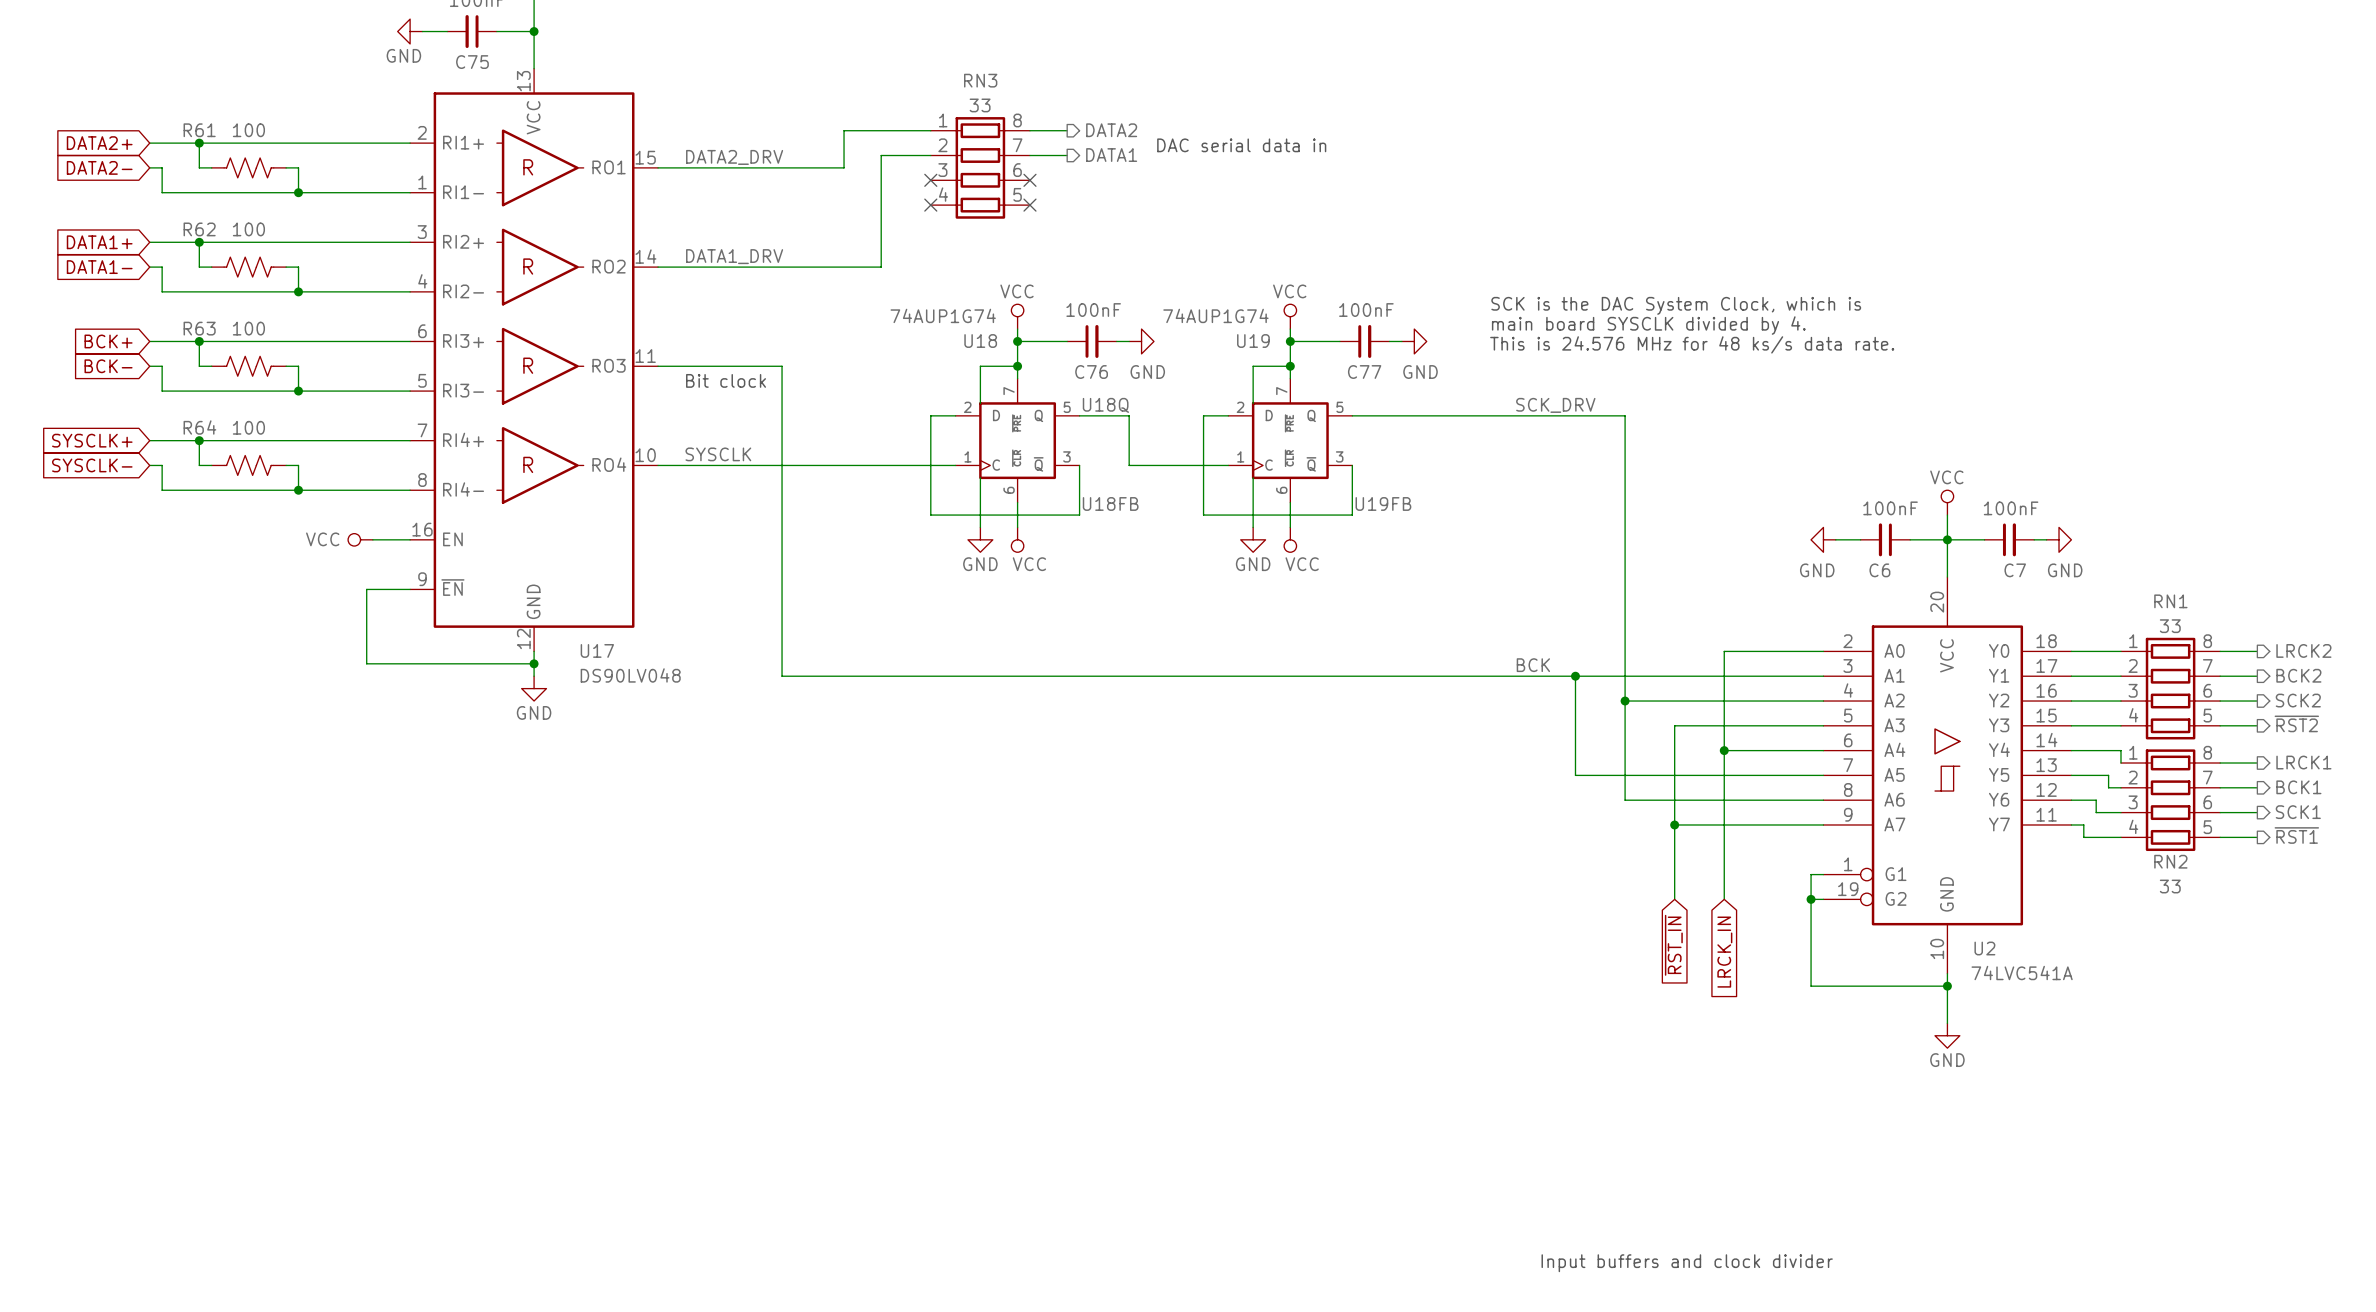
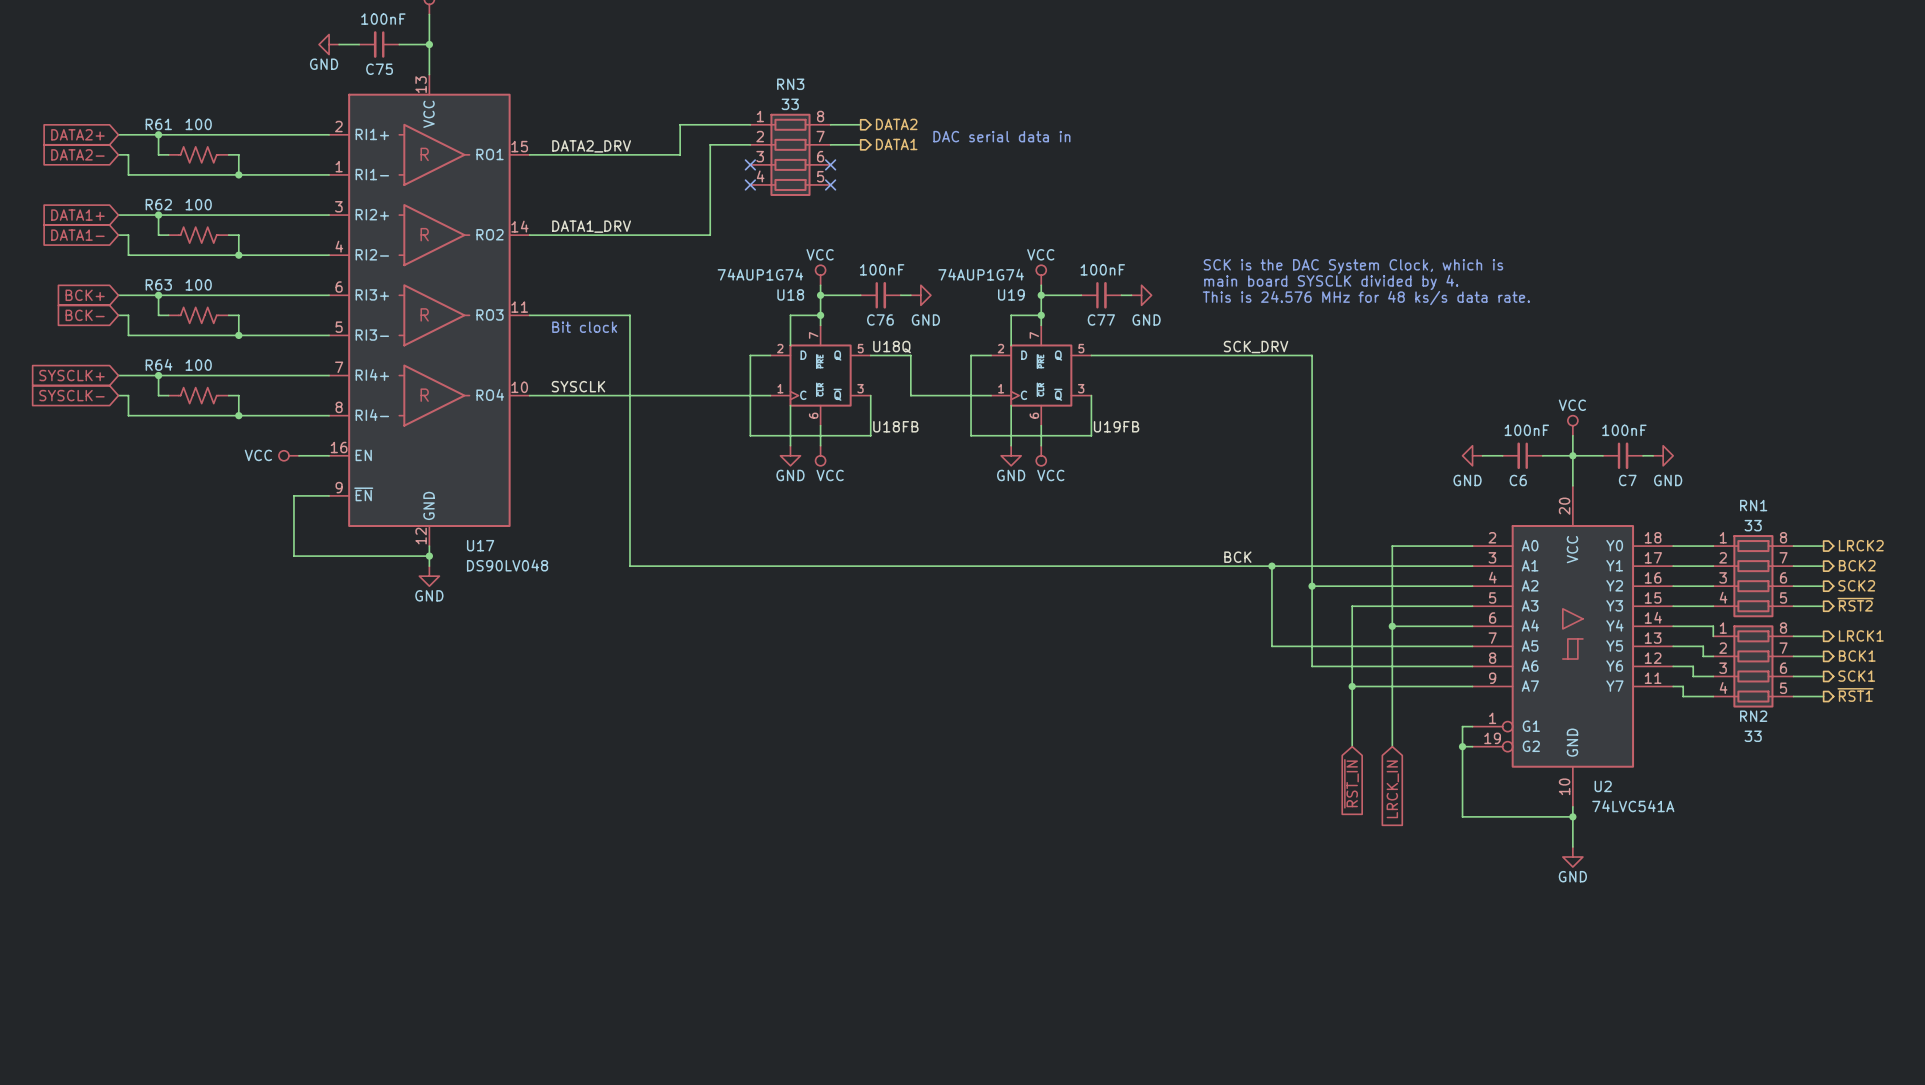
text: Input buffers and clock divider (1687, 1263) -> none

